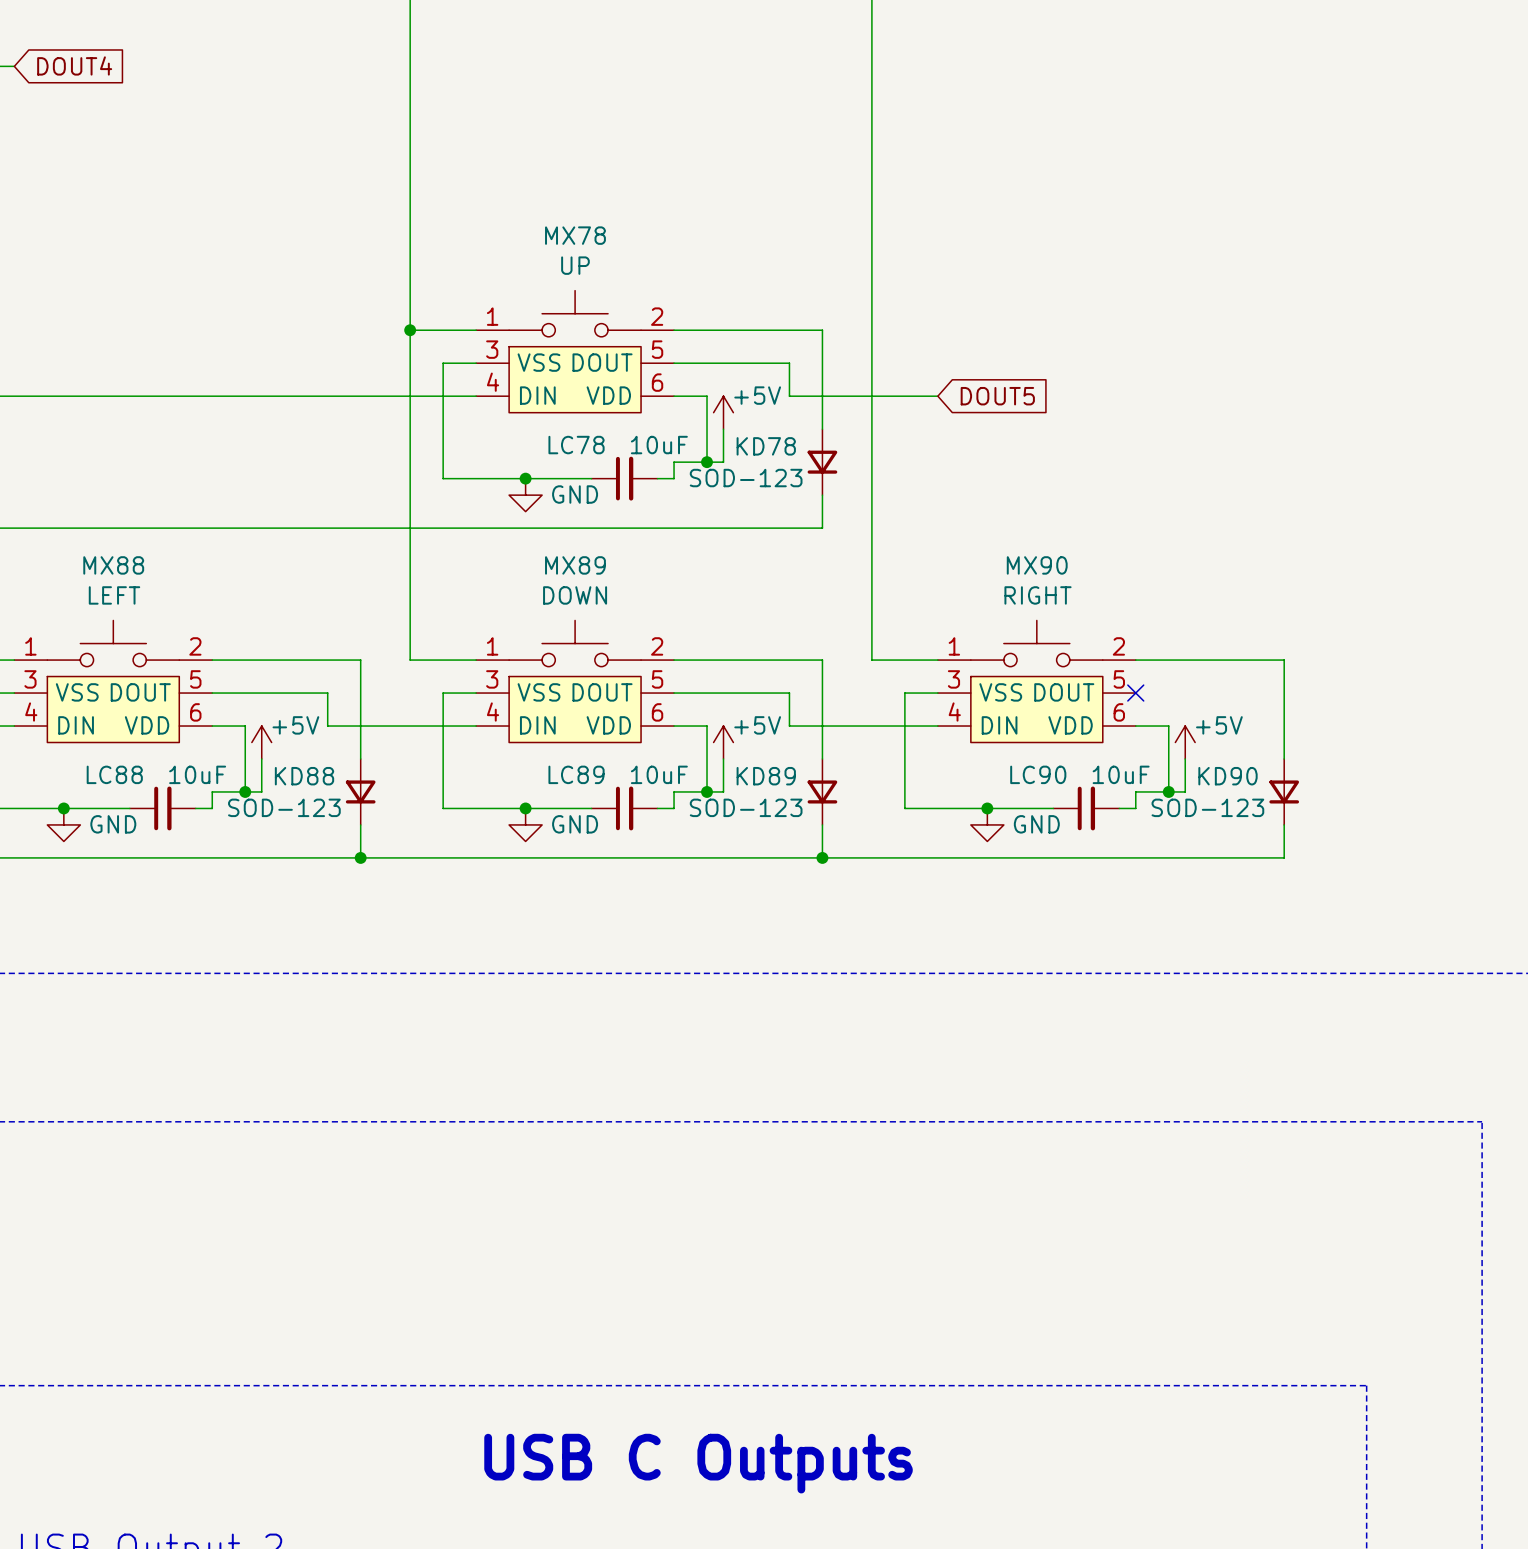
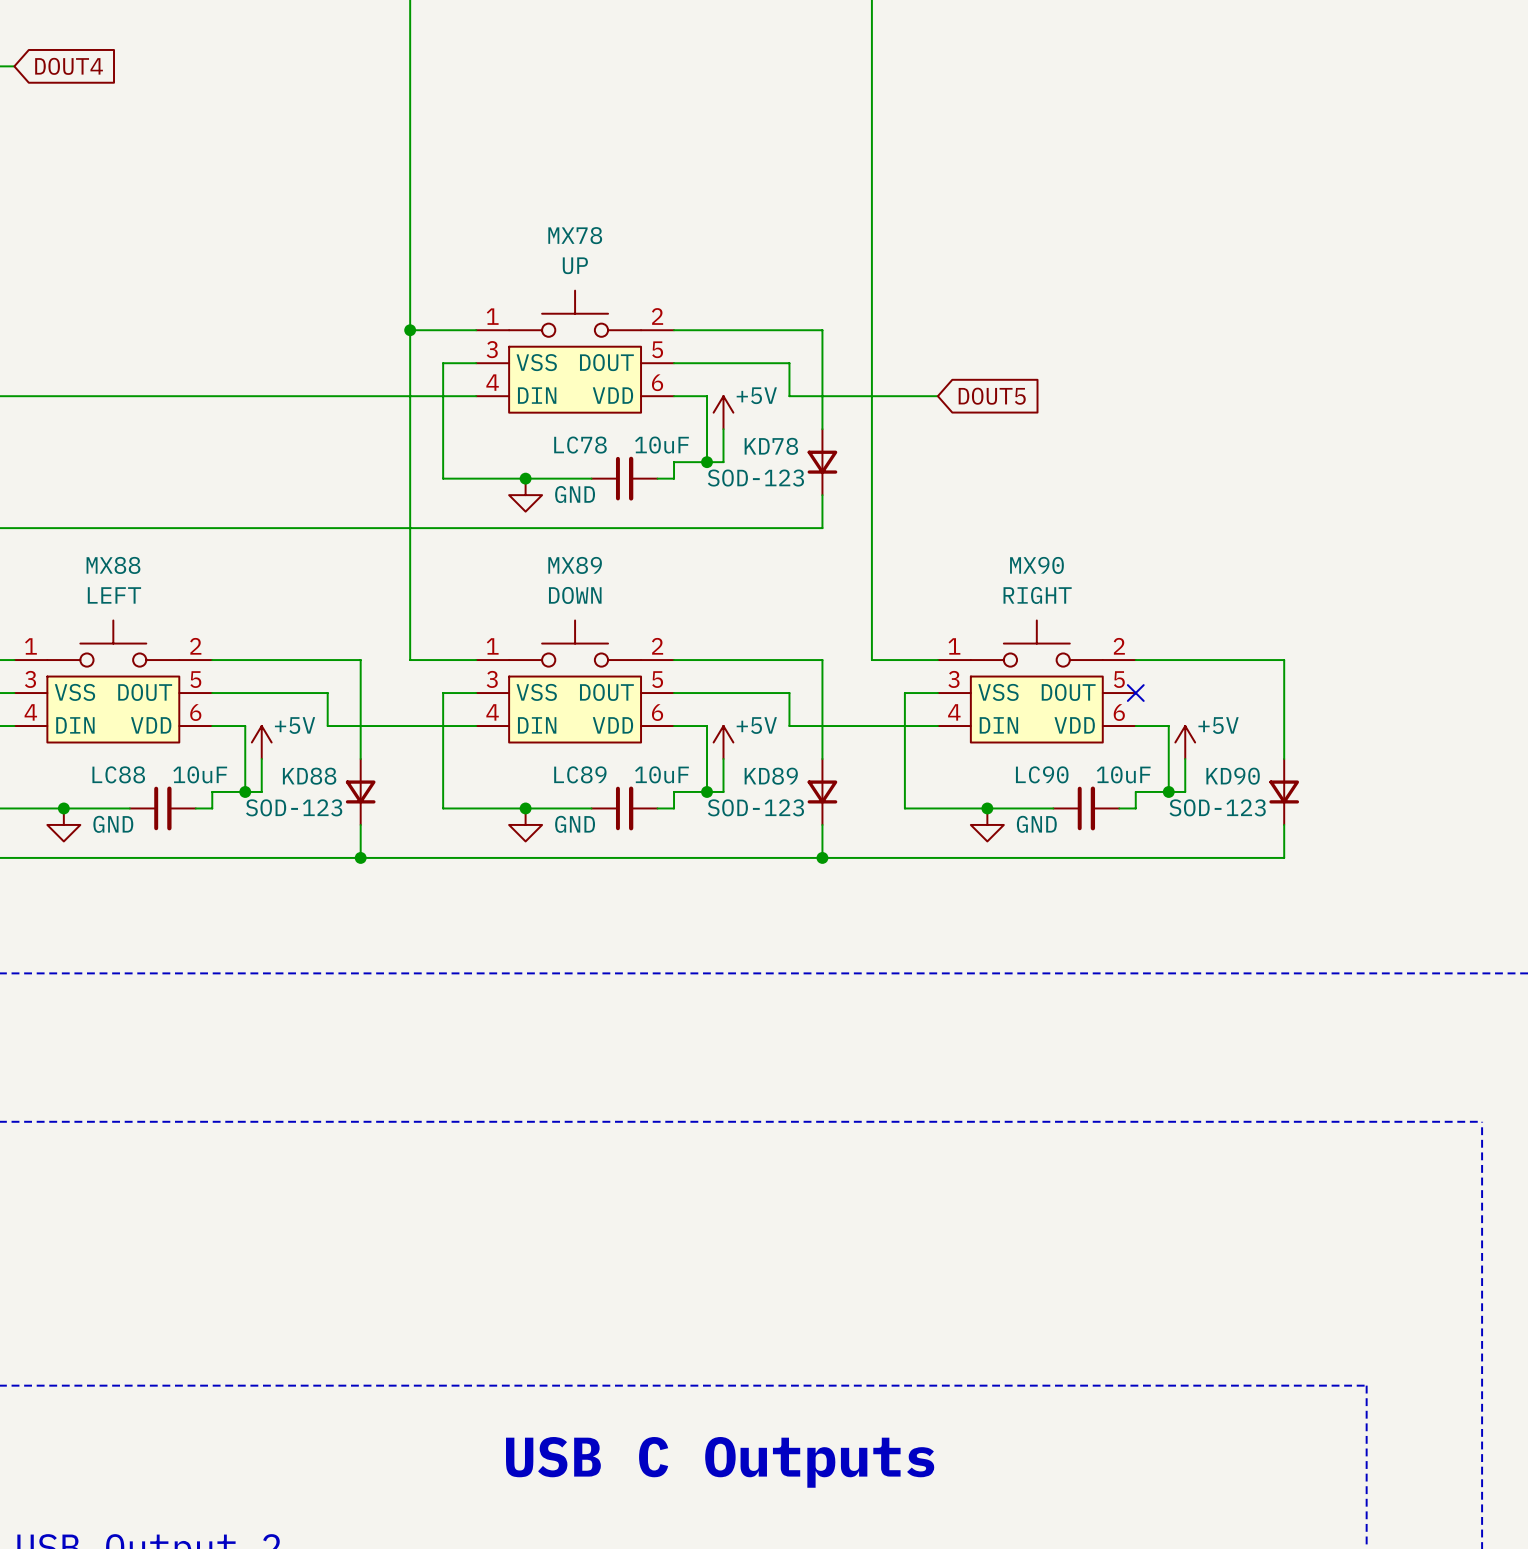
text position: USB C Outputs (698, 1463) -> USB C Outputs (720, 1462)

